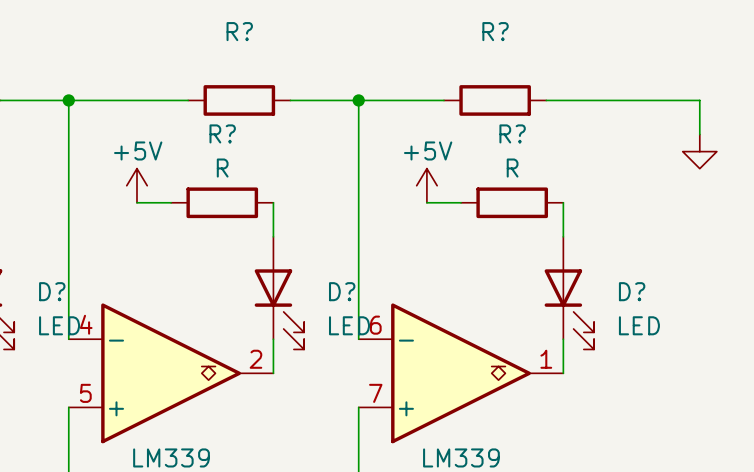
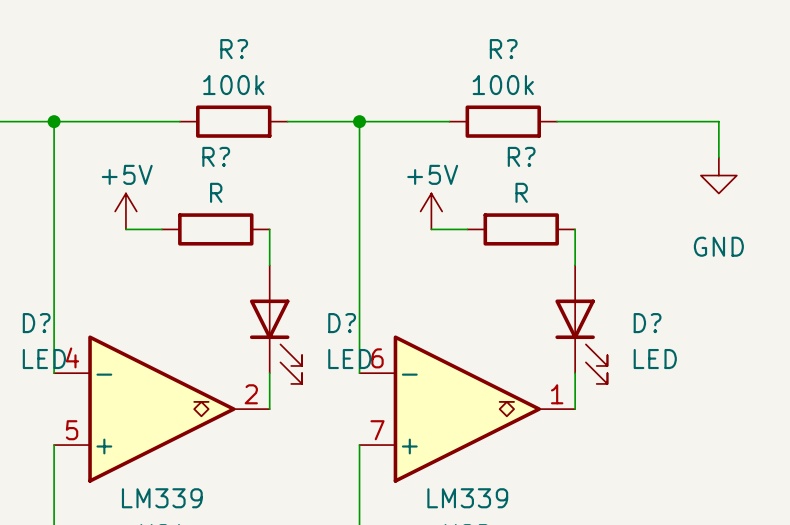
R? value: none -> 100k (233, 85)
R? value: none -> 100k (503, 85)
power symbol text: none -> GND (718, 246)

